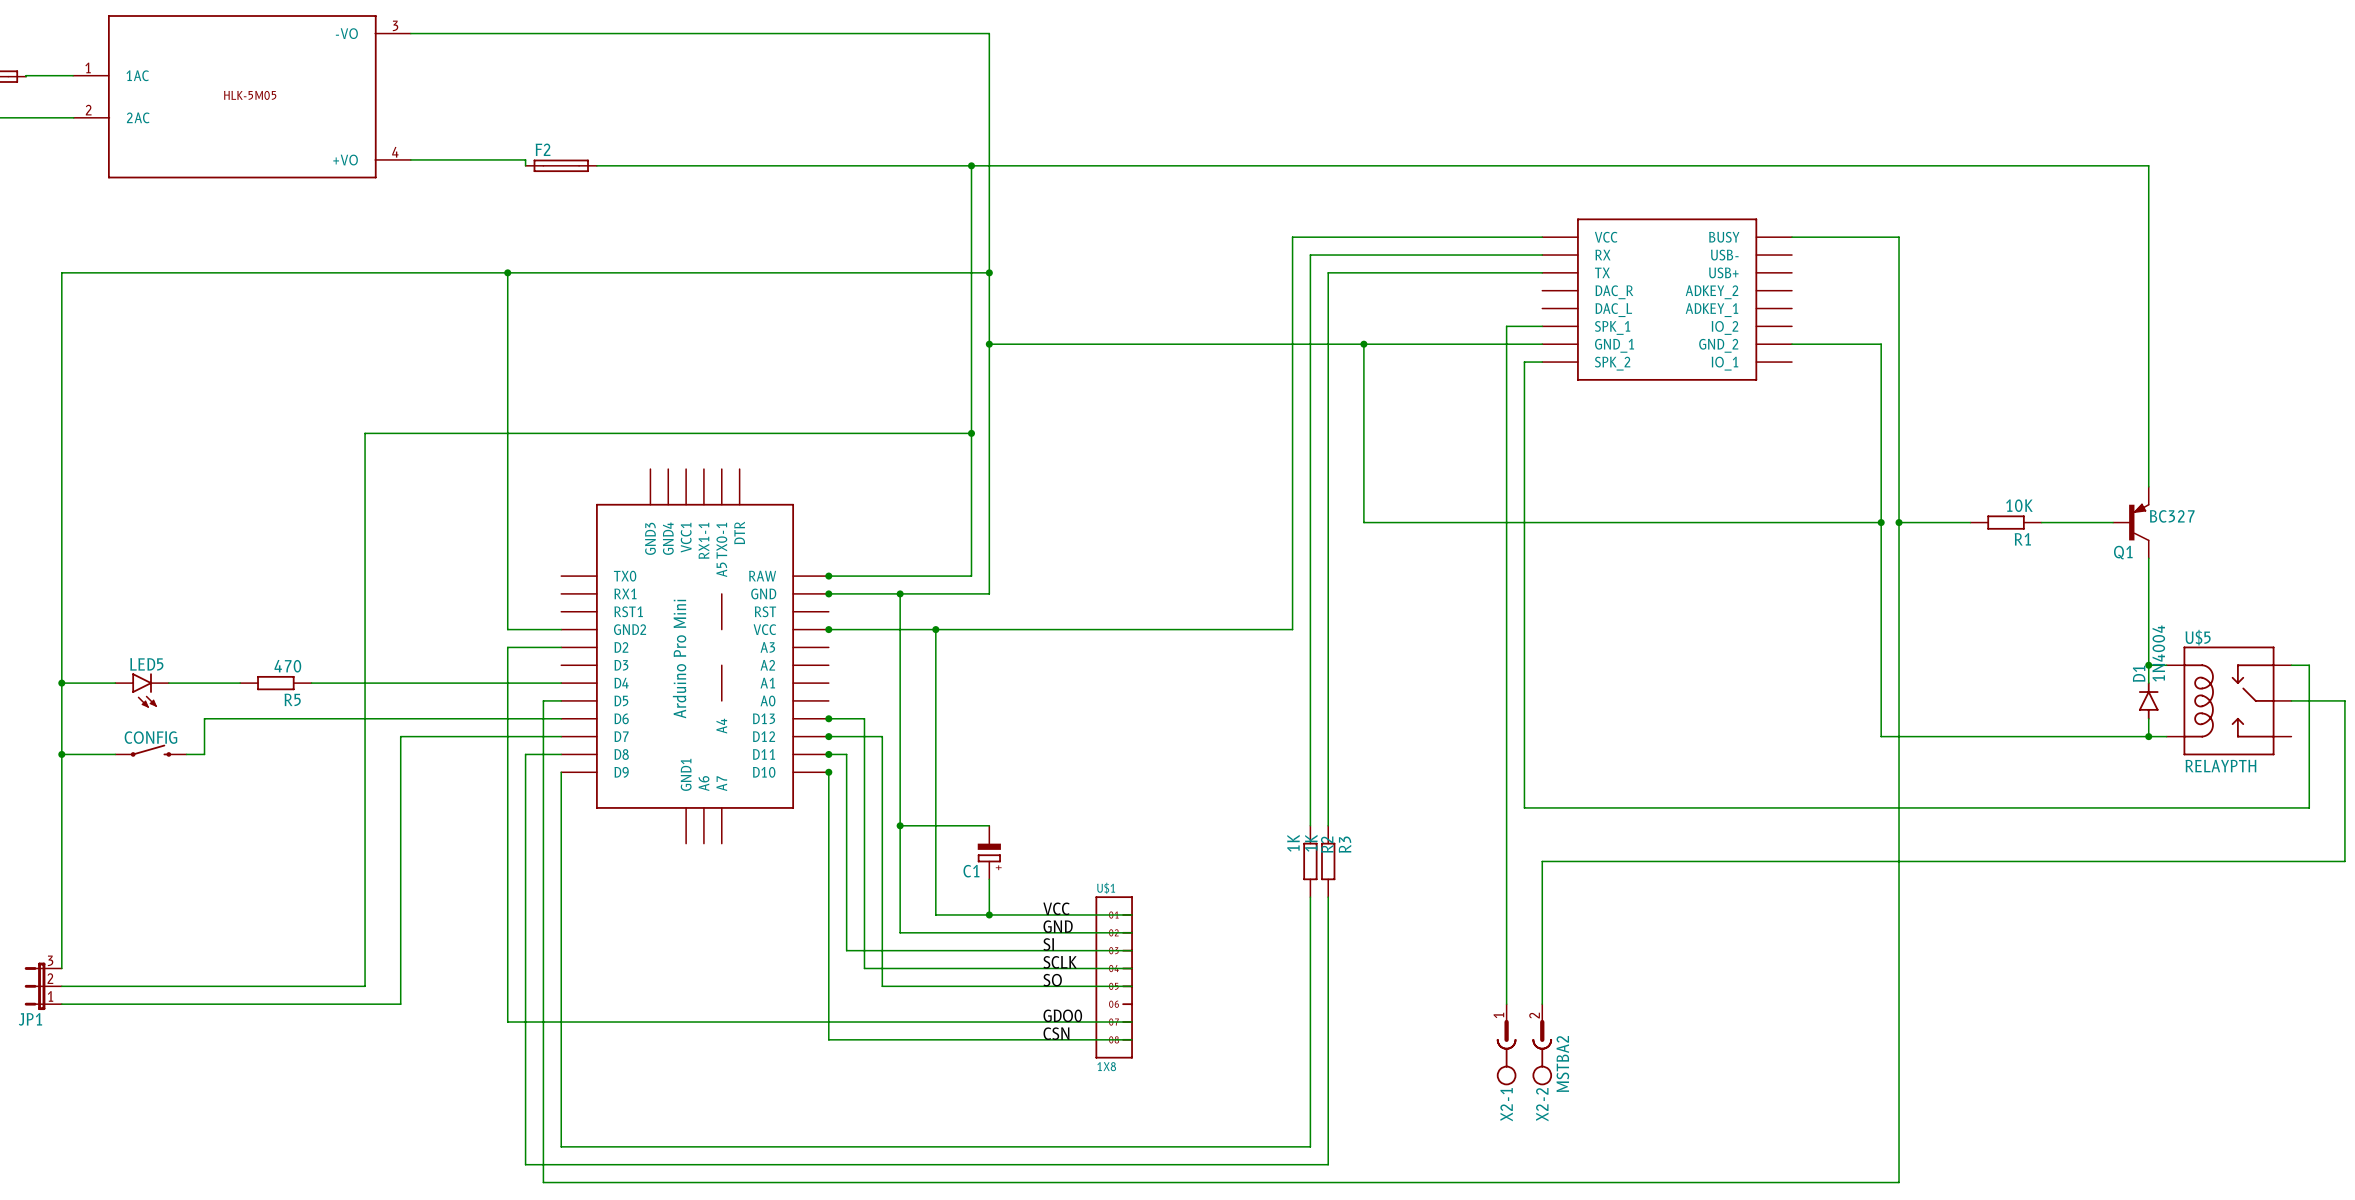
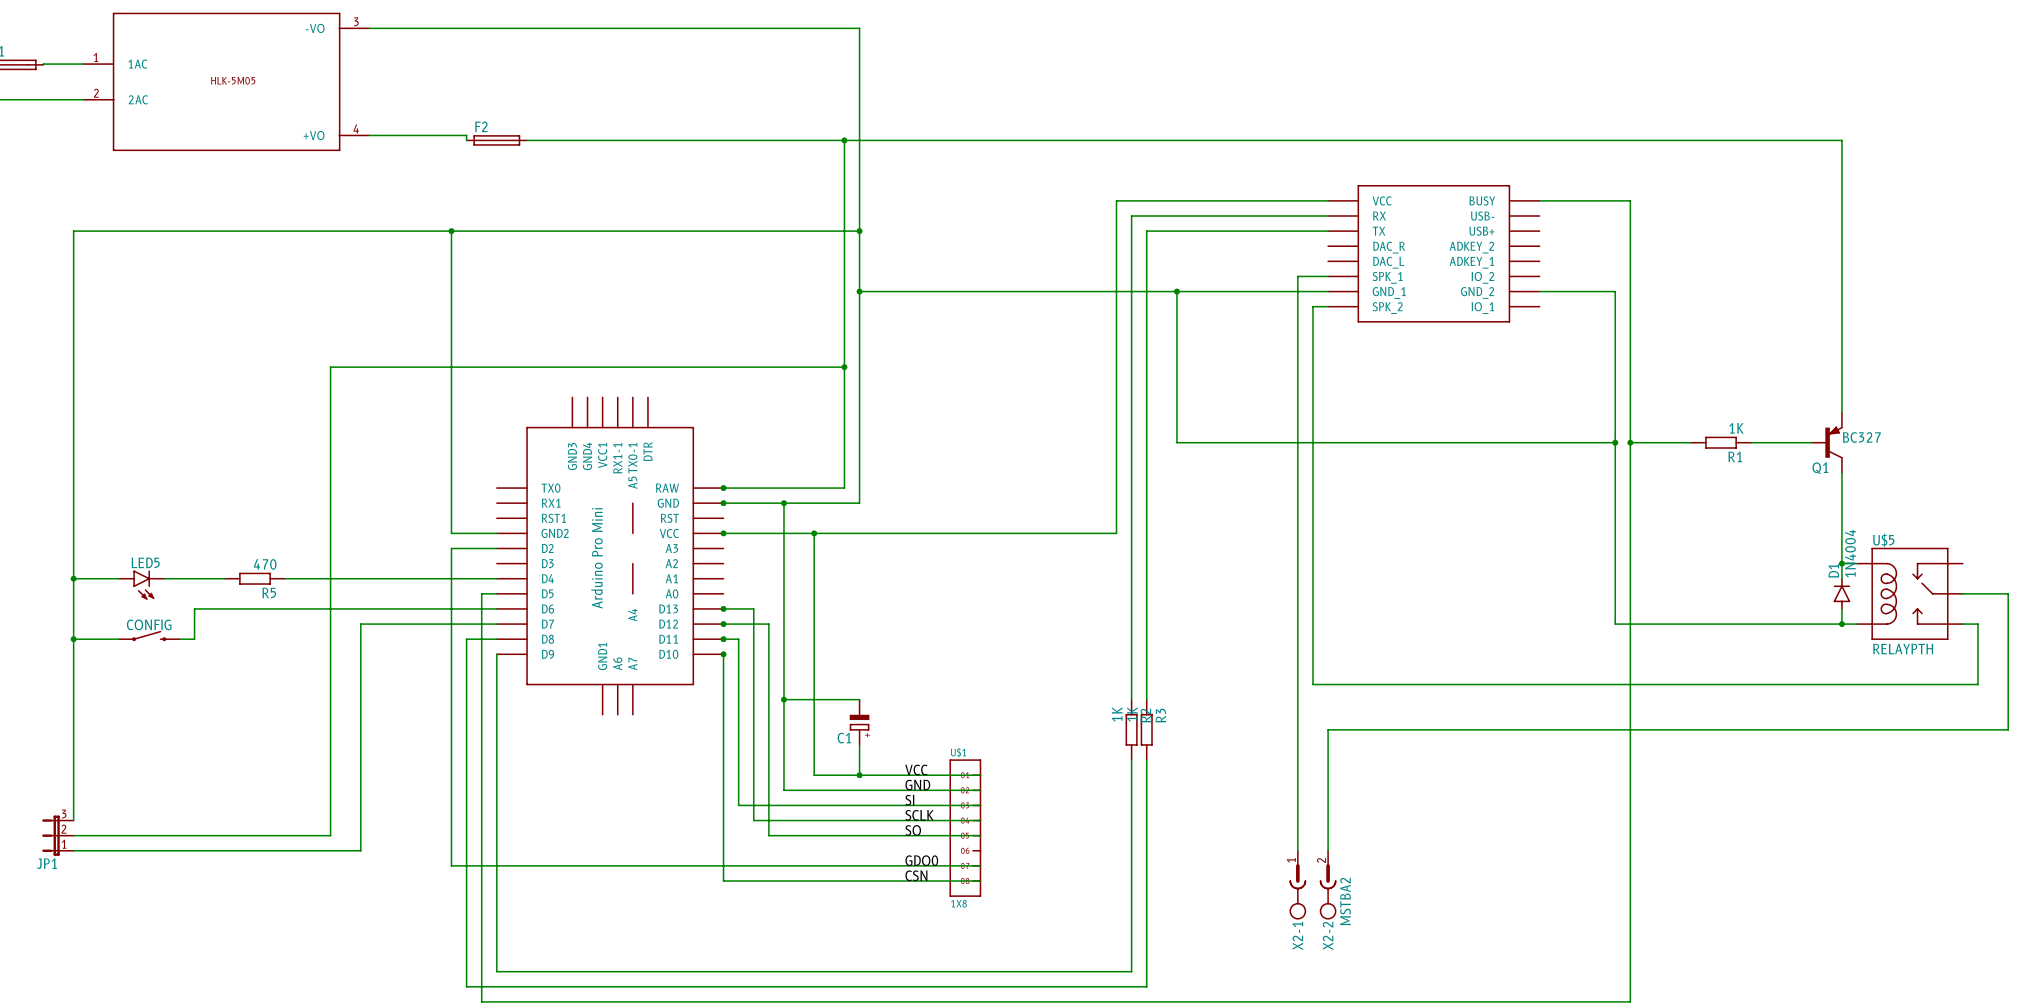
R1 value: 10K (2019, 505) -> 1K (1736, 428)
wire: (2291, 665) (2309, 665) (2309, 736) -> (1962, 624) (1977, 624)

